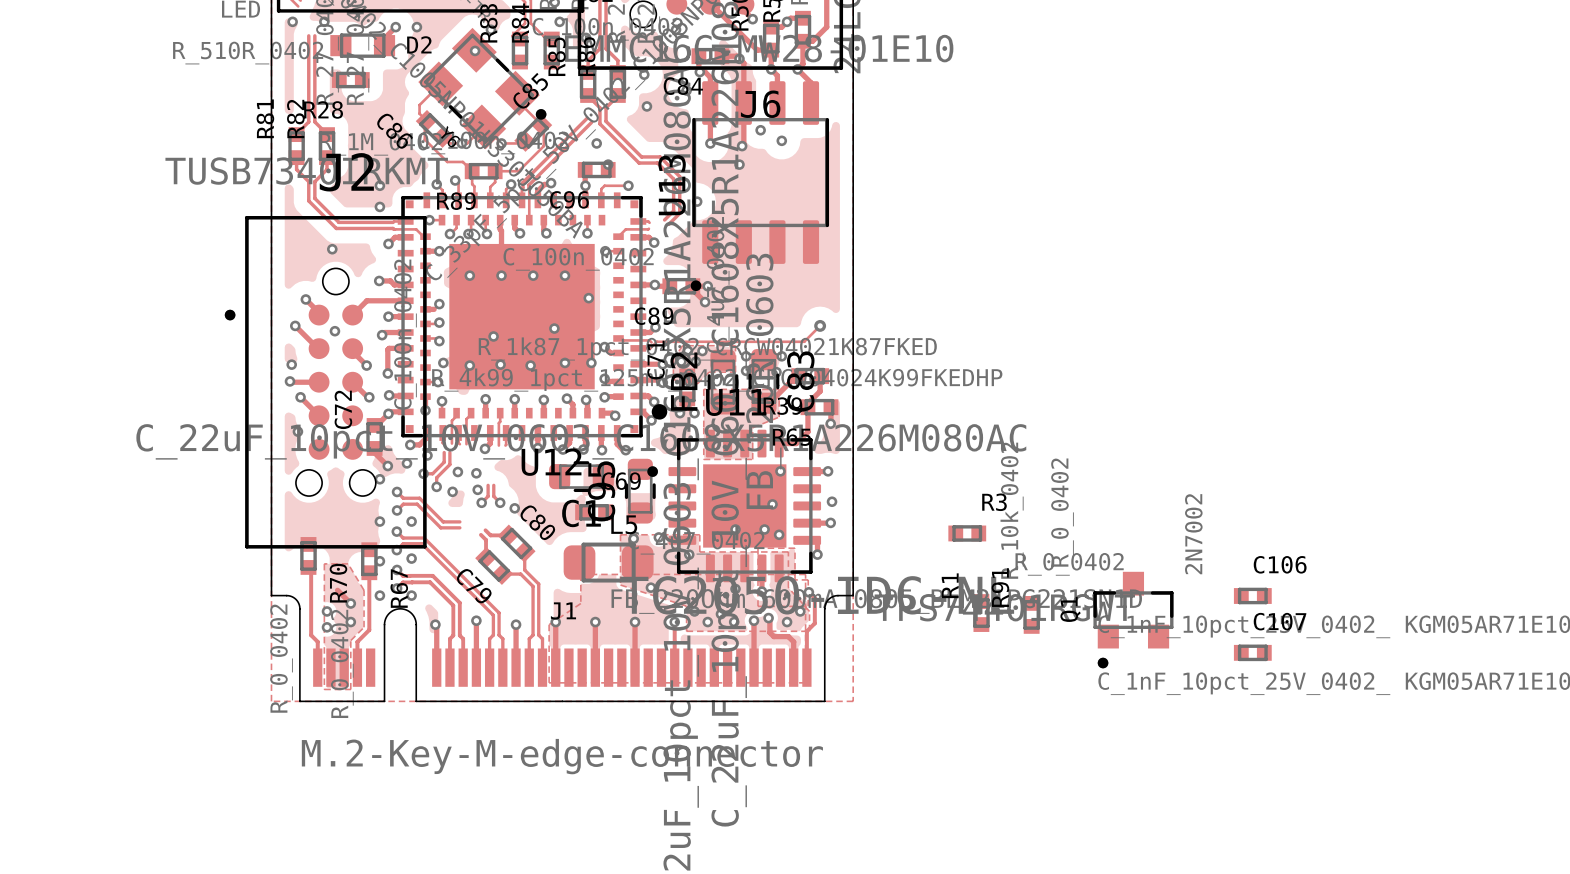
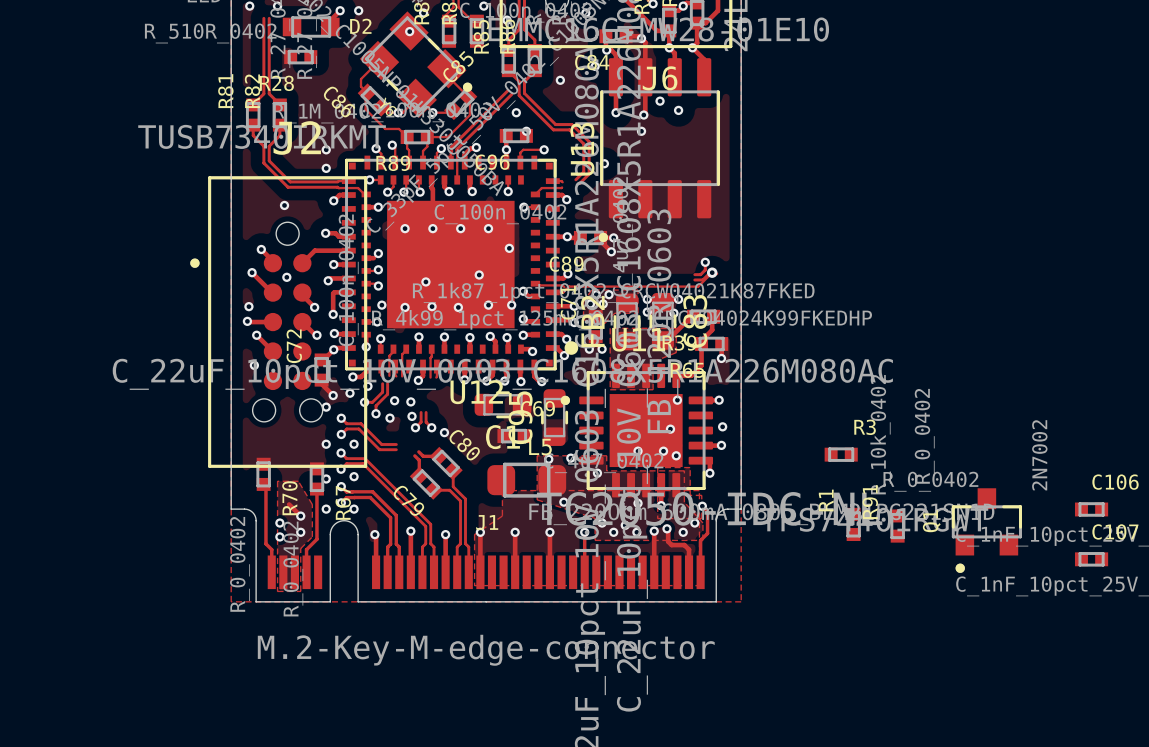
via: (644, 74) -> none
track: none -> (705, 262) (705, 270) (700, 274) (694, 274)
via: none -> (705, 262)
track: none -> (716, 273) (709, 273) (702, 279) (694, 279)

